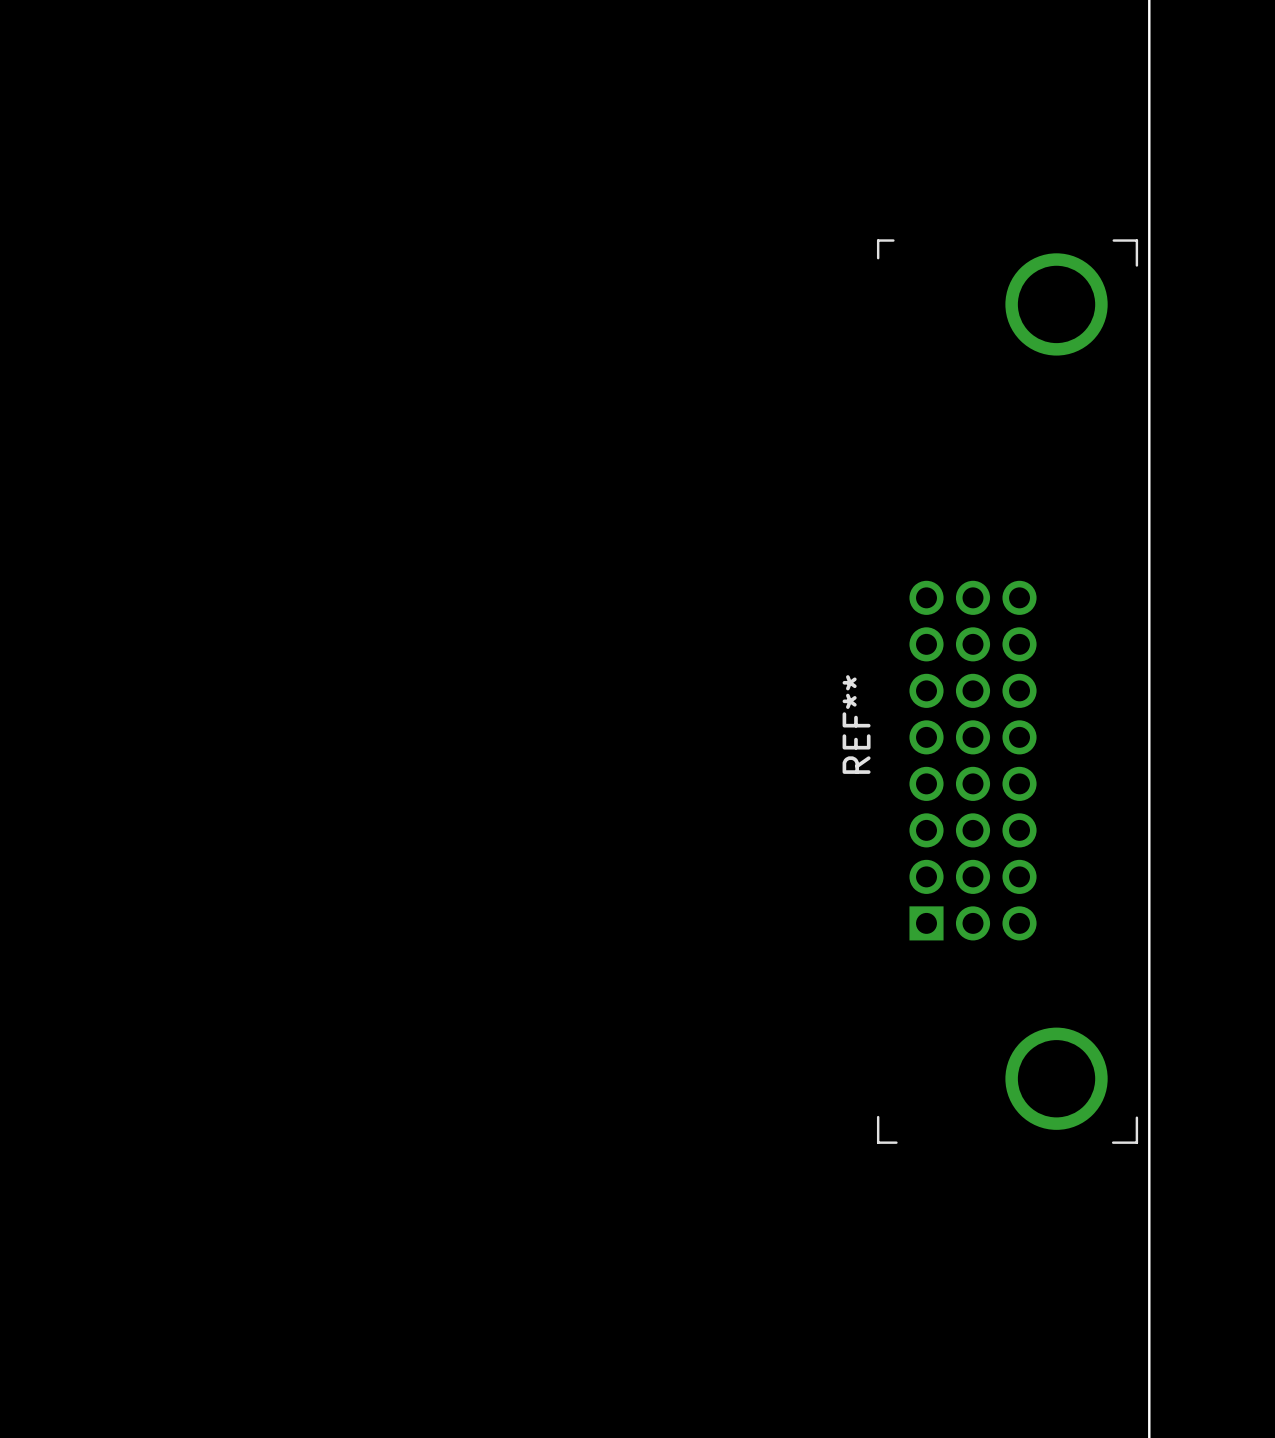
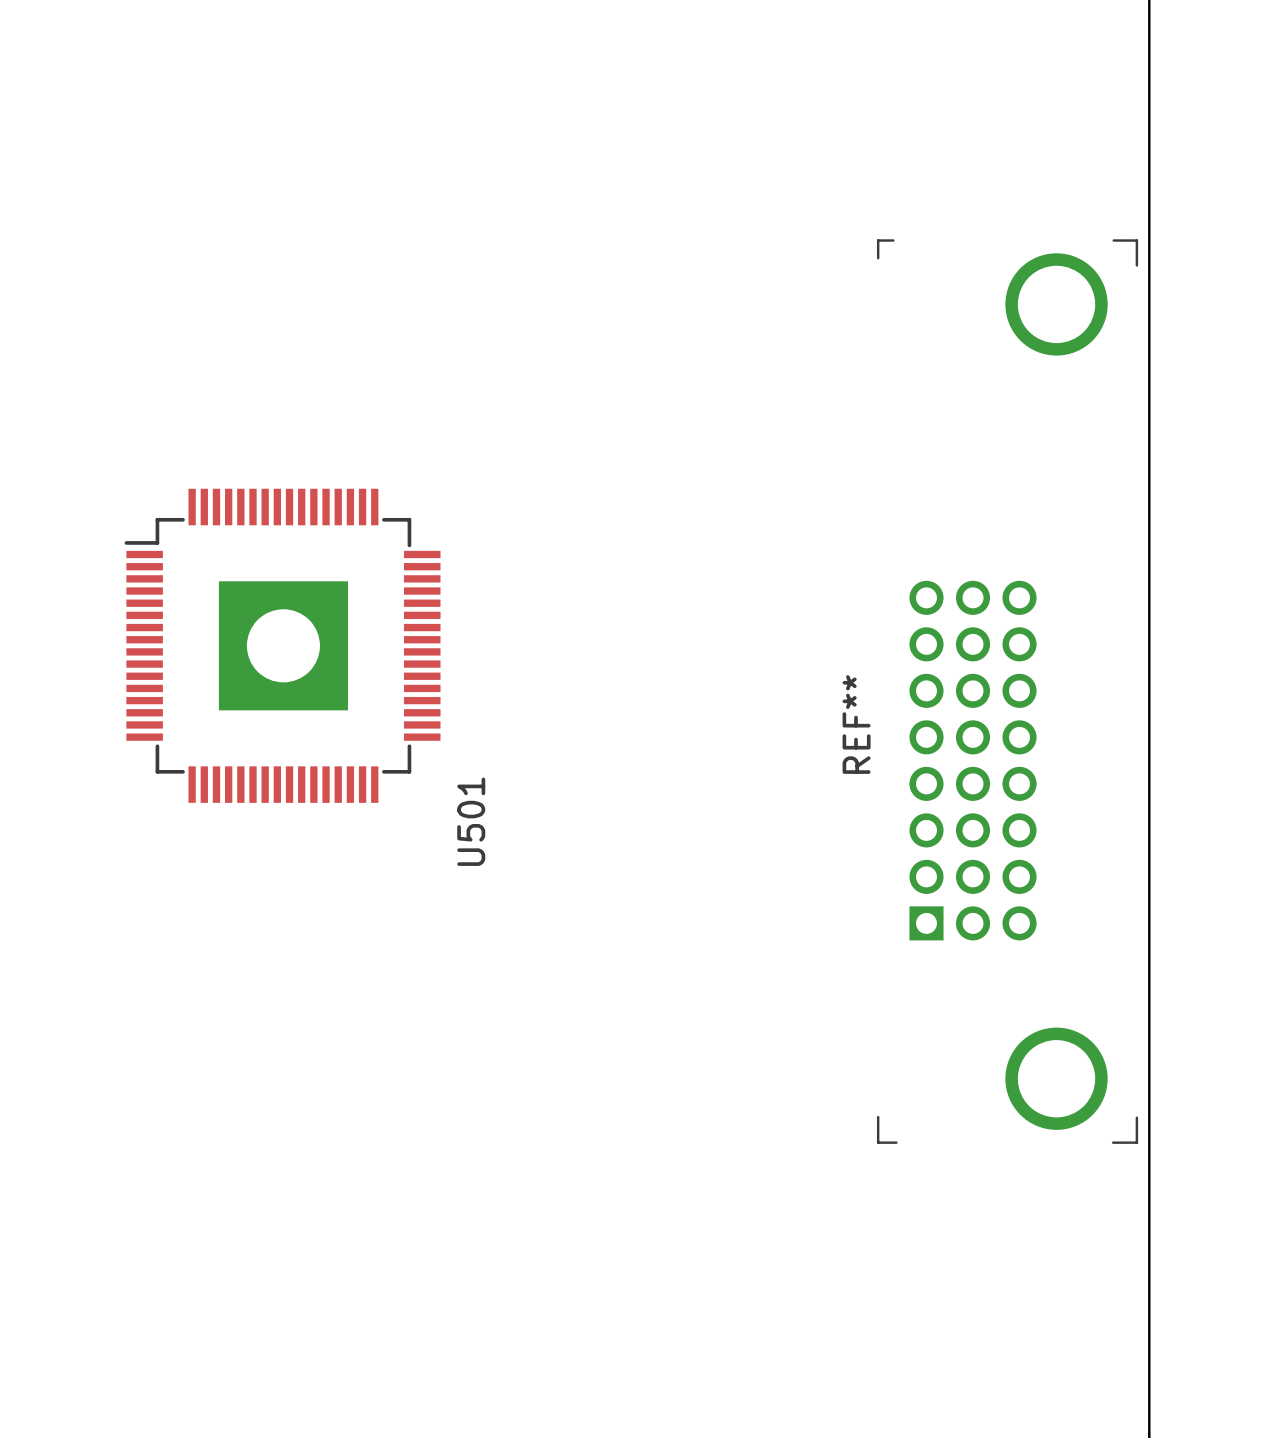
U501: none -> (282, 645)

